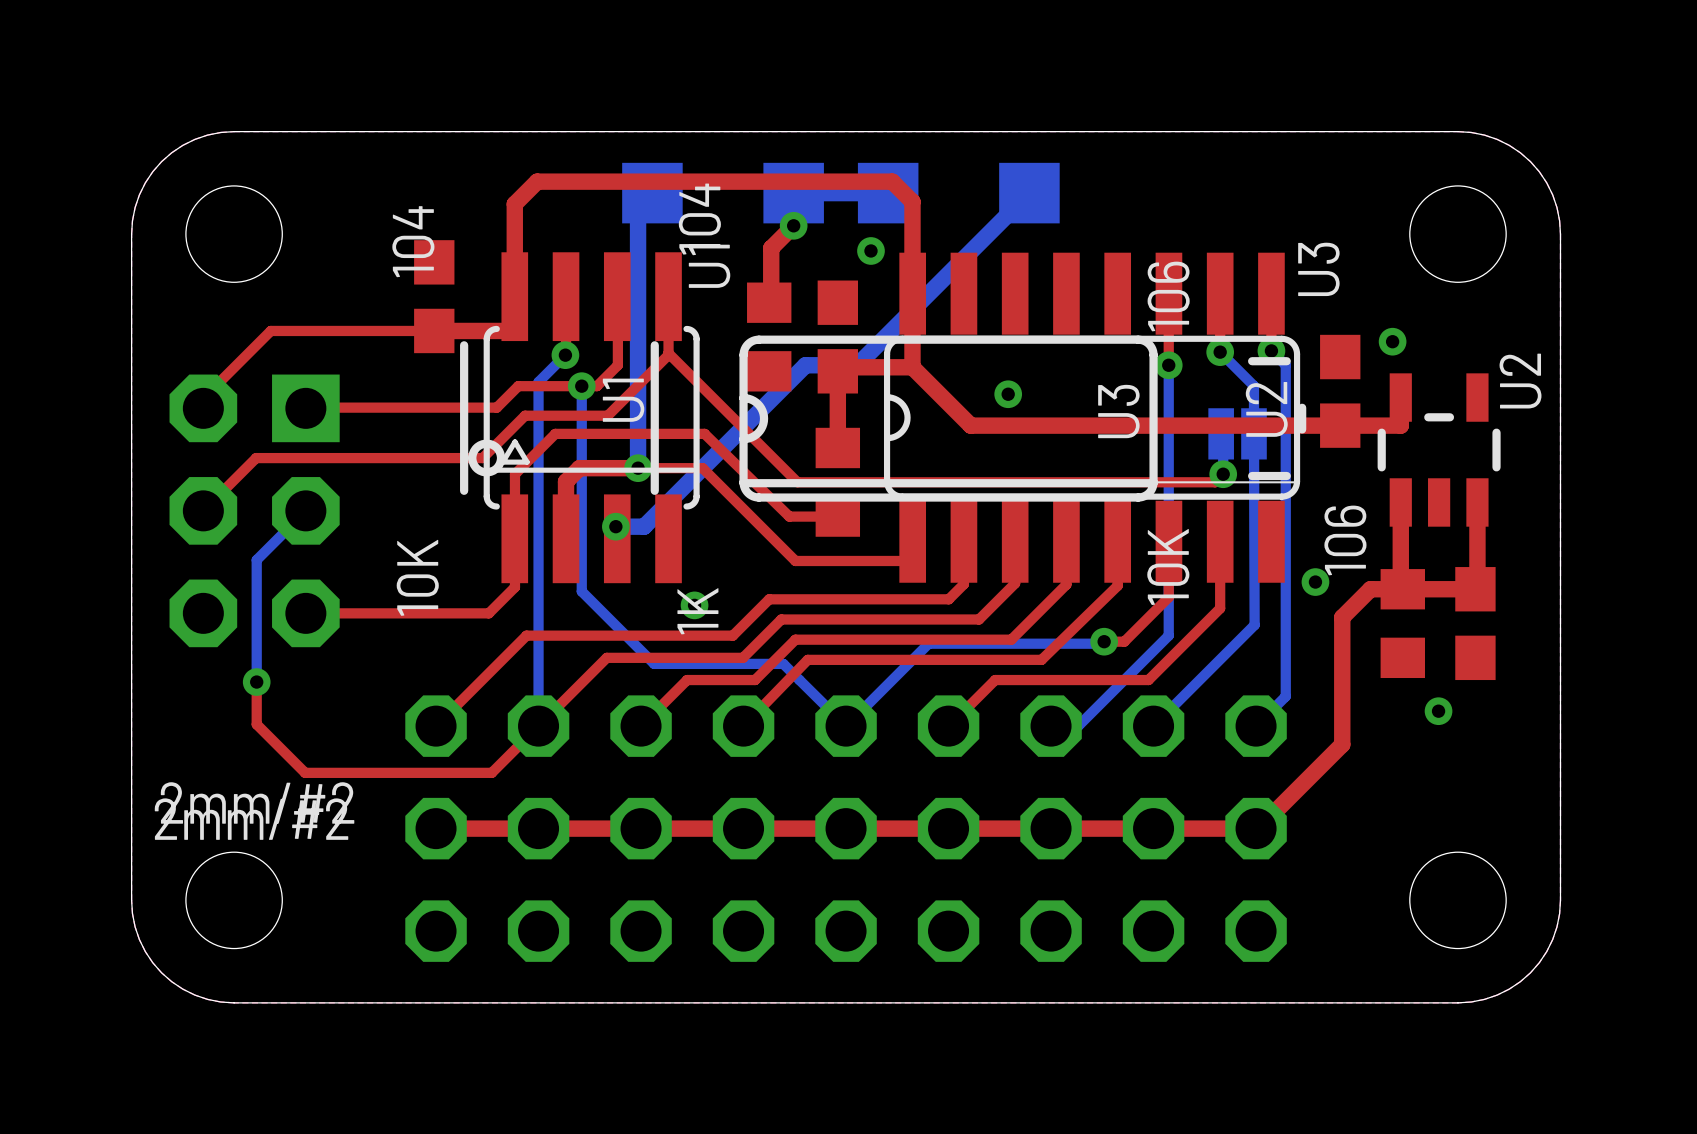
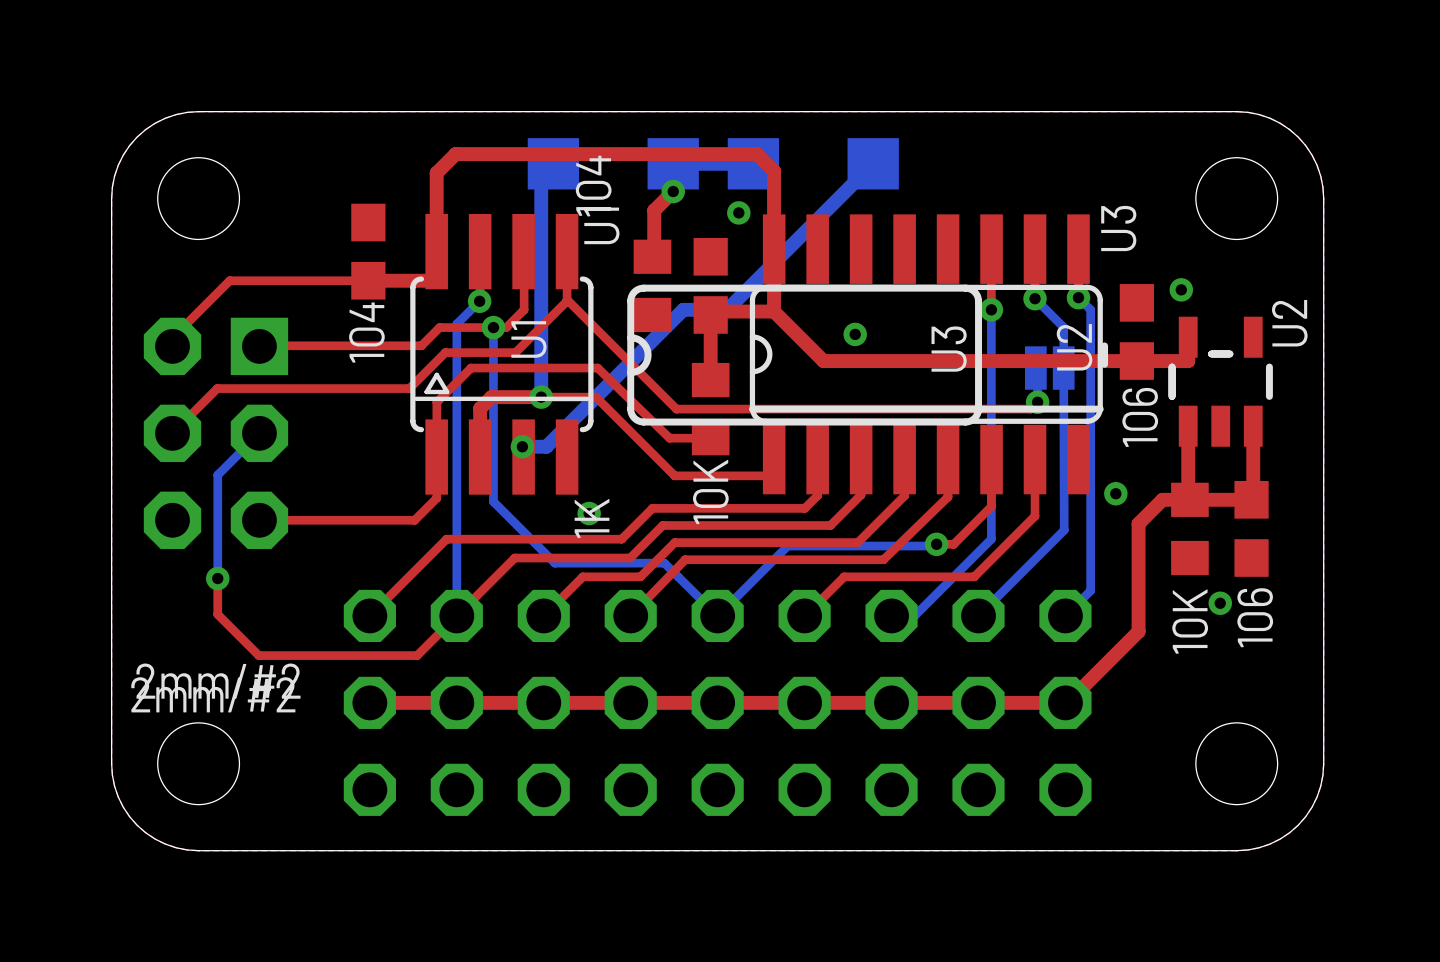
text position: 104 (413, 241) -> 104 (366, 332)
text: 106 (1168, 296) -> none
line: (464, 345) (464, 490) -> none
line: (654, 345) (654, 490) -> none
line: (1252, 361) (1286, 361) -> none
line: none -> (1211, 353) (1229, 353)
line: none -> (1172, 367) (1172, 396)
drawing: [468, 439, 506, 477] -> none
line: (1252, 476) (1286, 476) -> none
line: (743, 483) (1153, 483) -> (752, 409) (1100, 409)
text position: 106 (1345, 540) -> 106 (1140, 417)
text: 10K (1168, 567) -> none
text: 10K (417, 577) -> none
text: none -> 10K (710, 492)
text: none -> 106 (1255, 617)
text: none -> 10K (1190, 621)

